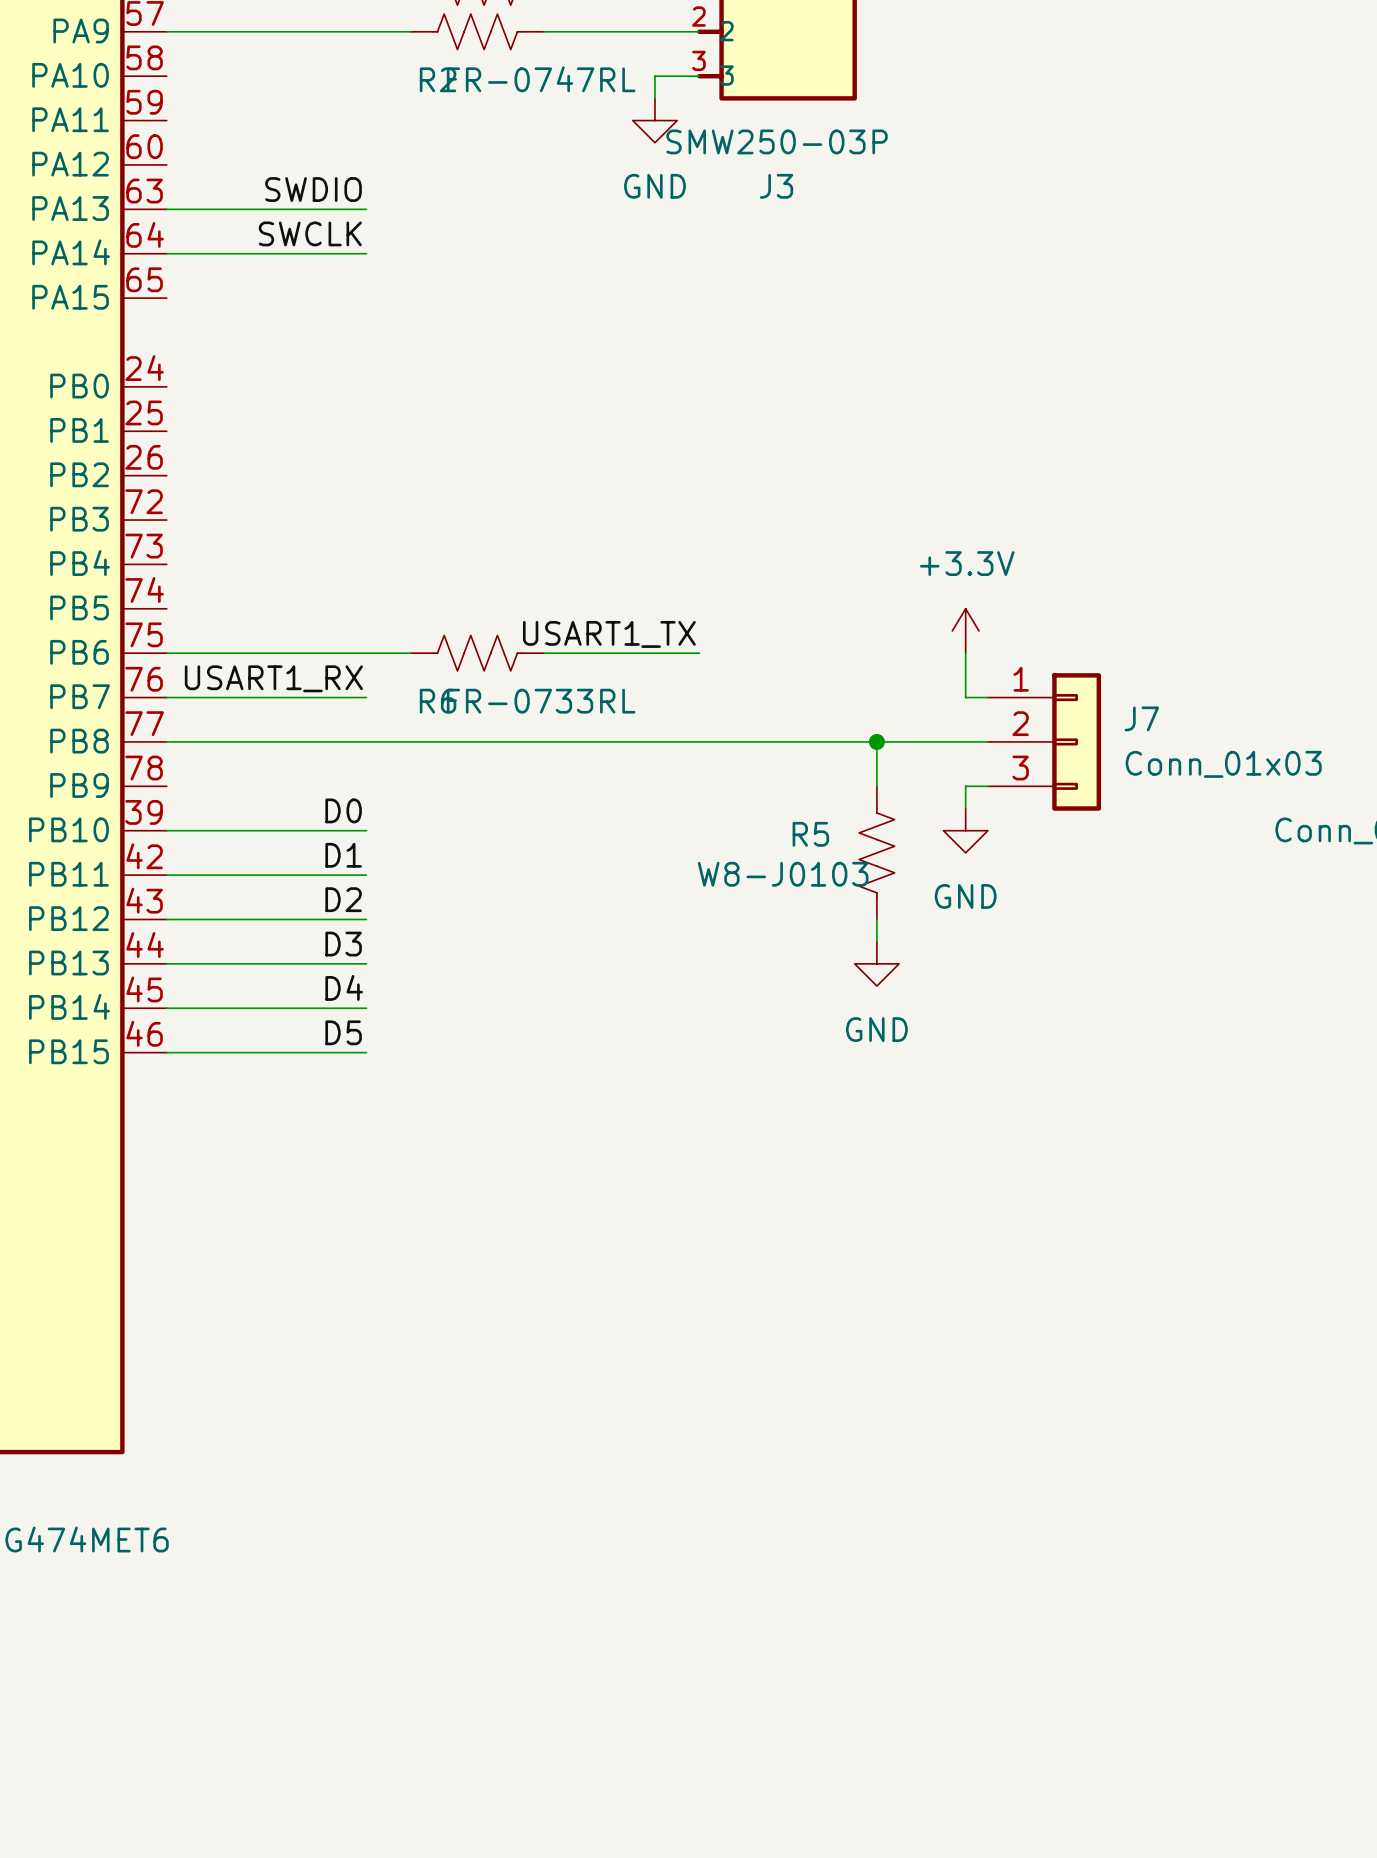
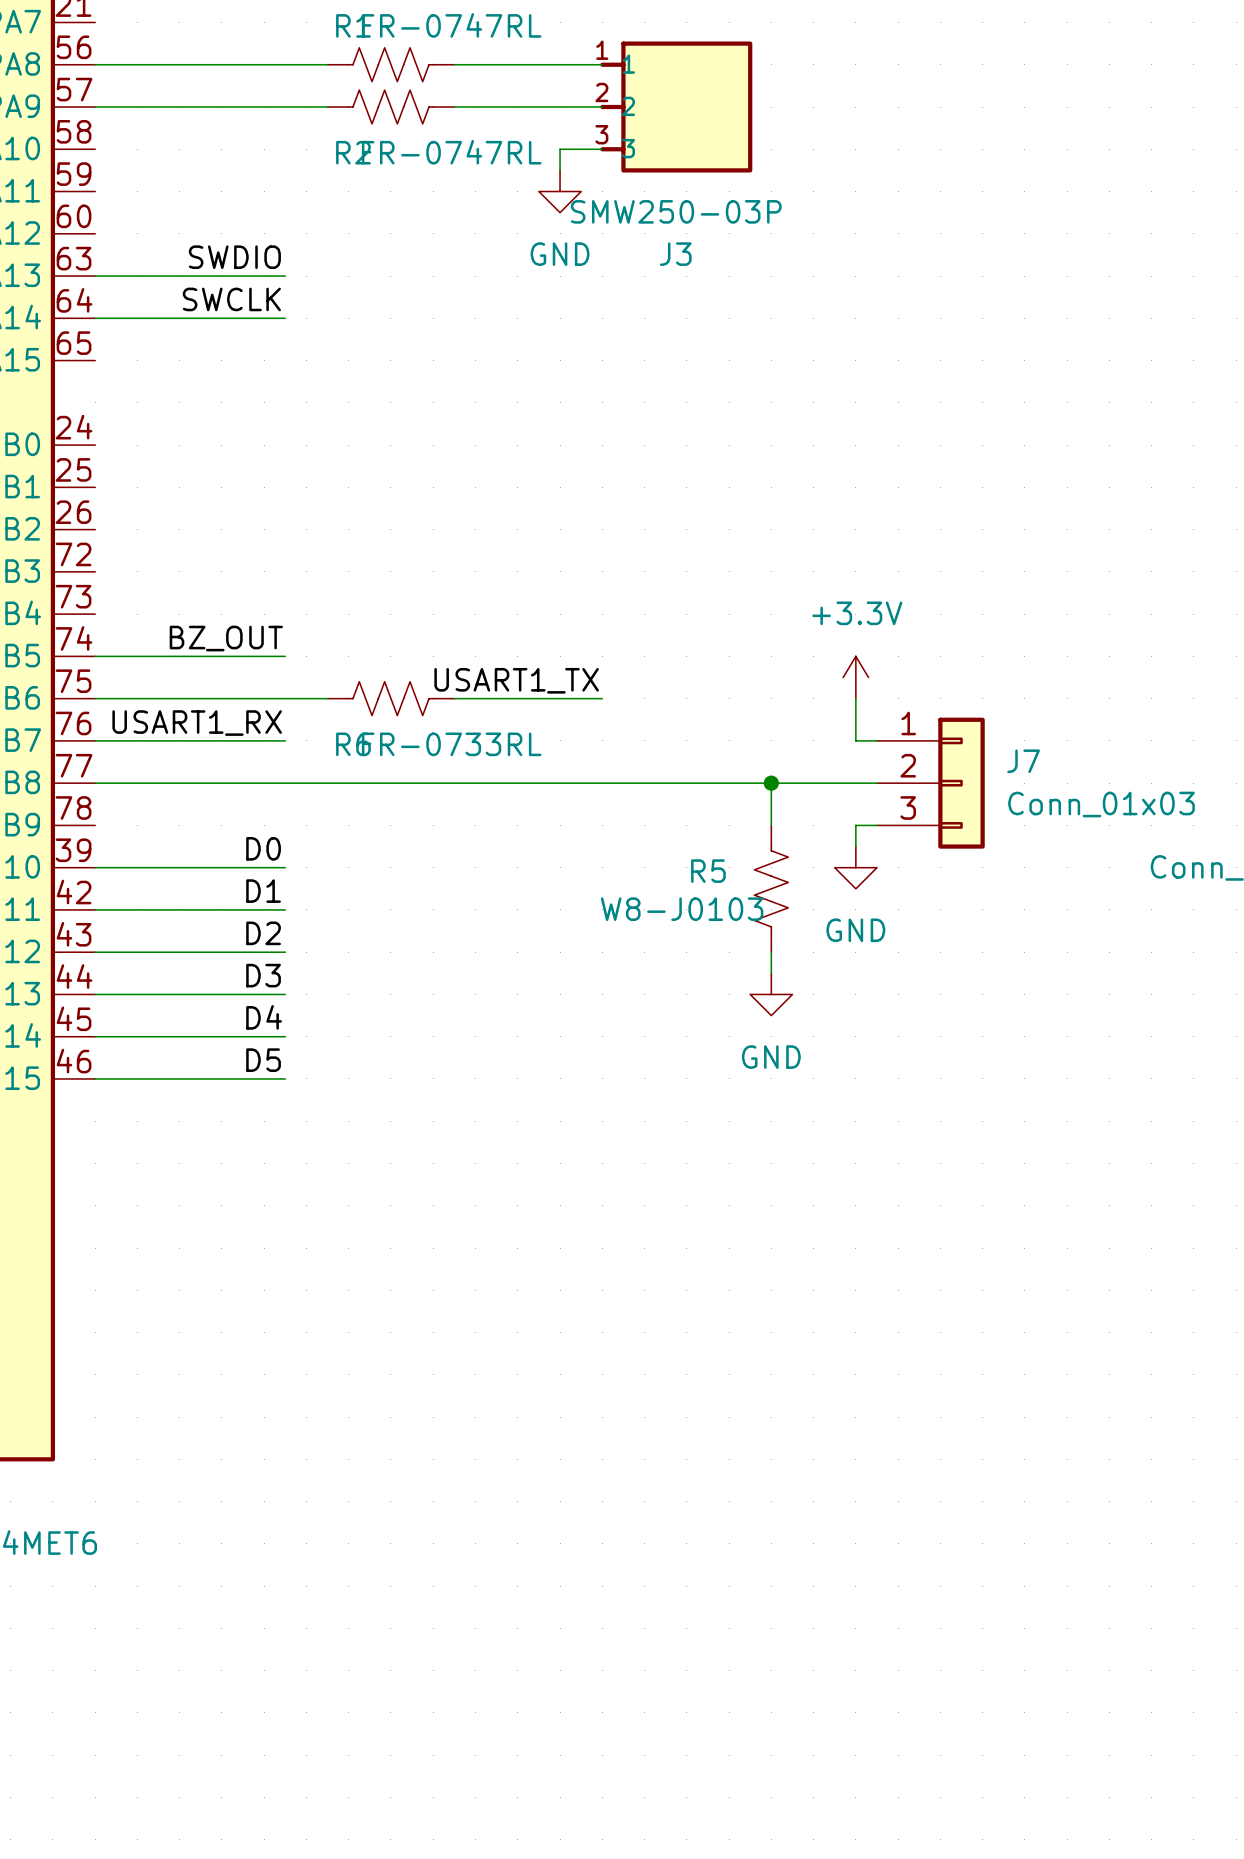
label: none -> BZ_OUT (226, 638)
wire: none -> (95, 656) (285, 656)

